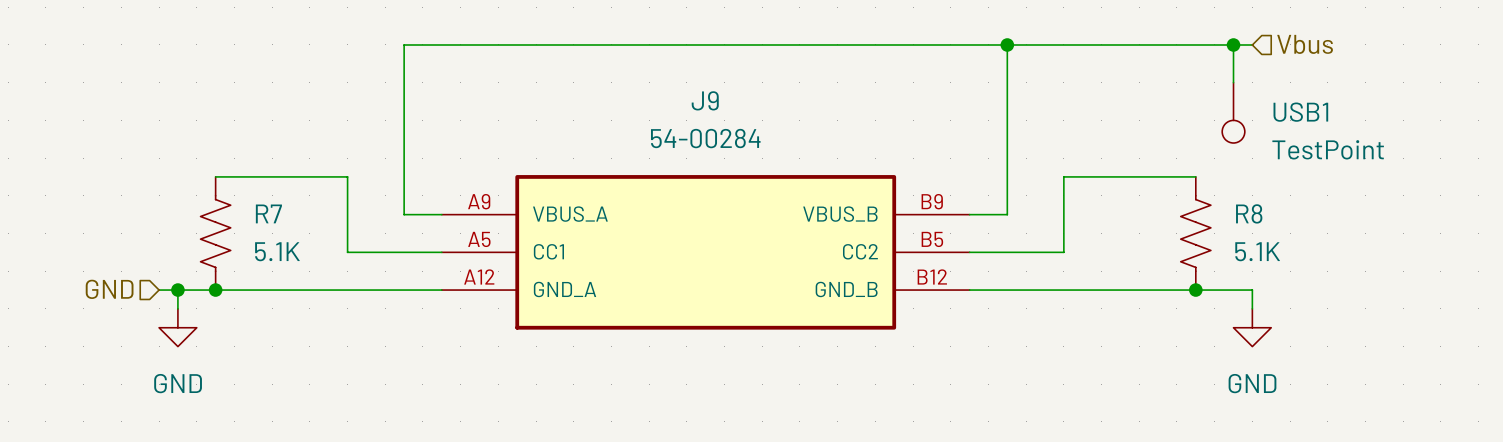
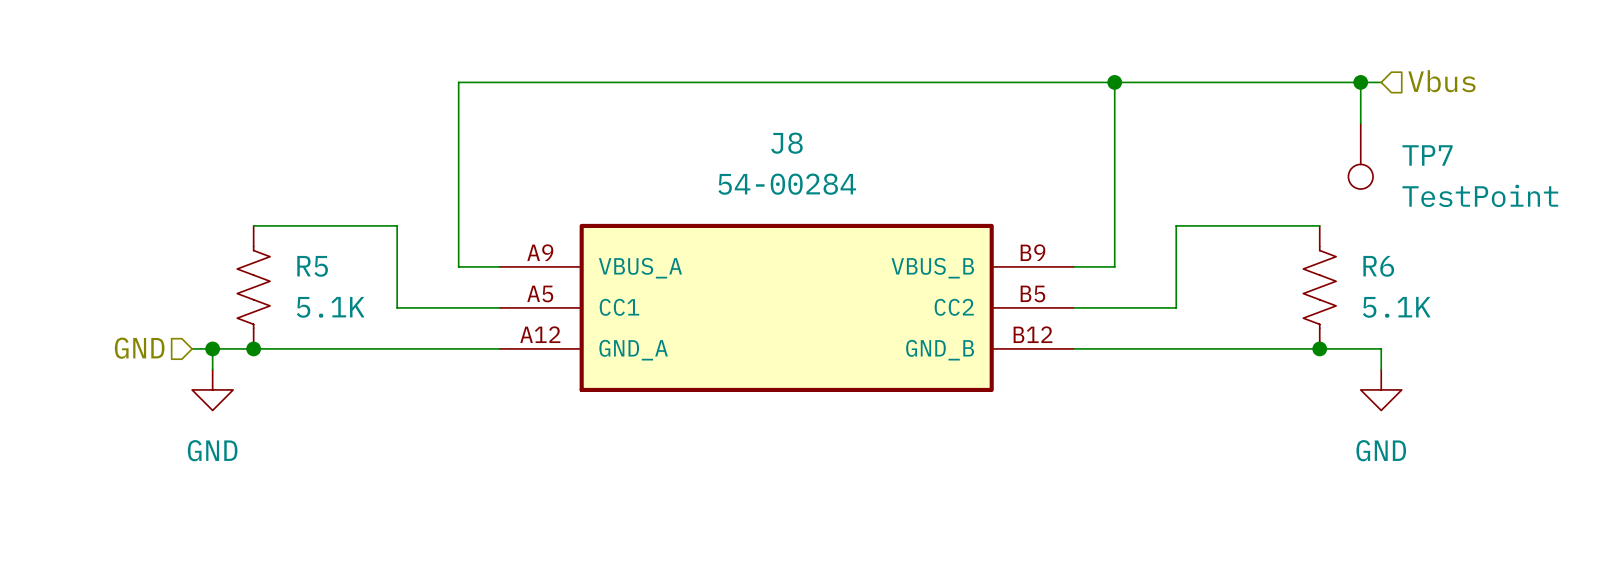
J9 name: J9 (705, 100) -> J8 (786, 143)
USB1 name: USB1 (1300, 112) -> TP7 (1427, 155)
R7 name: R7 (268, 213) -> R5 (312, 266)
R8 name: R8 (1249, 213) -> R6 (1378, 266)

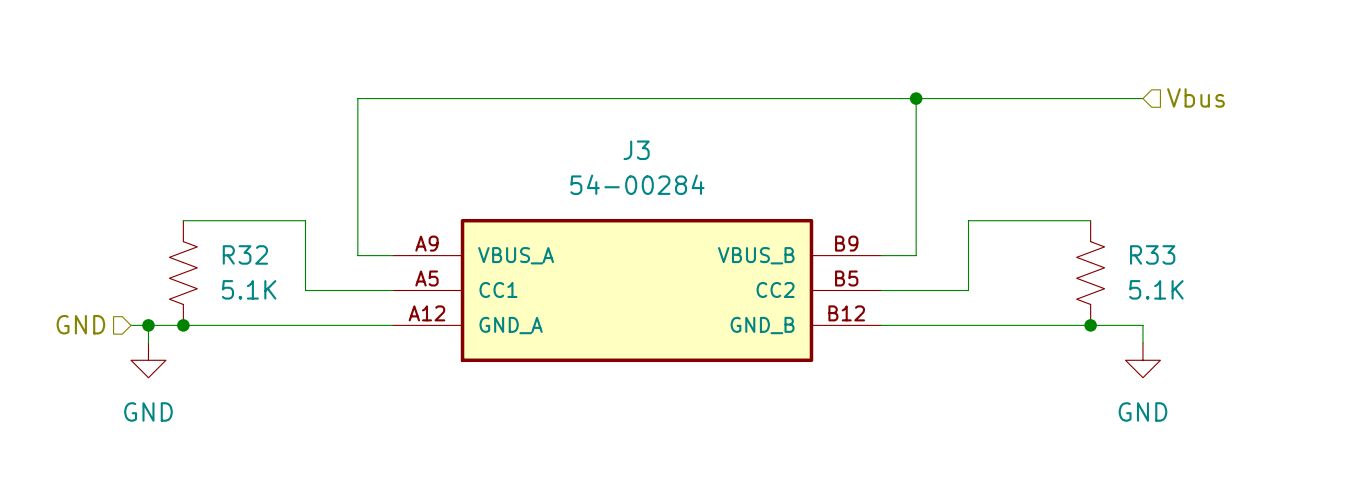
wire: (1360, 82) (1360, 123) -> none
junction: (1360, 82) -> none
J8 name: J8 (786, 143) -> J3 (636, 150)
TP7: TestPoint (1360, 156) -> none
R5 name: R5 (312, 266) -> R32 (245, 254)
R6 name: R6 (1378, 266) -> R33 (1152, 254)

